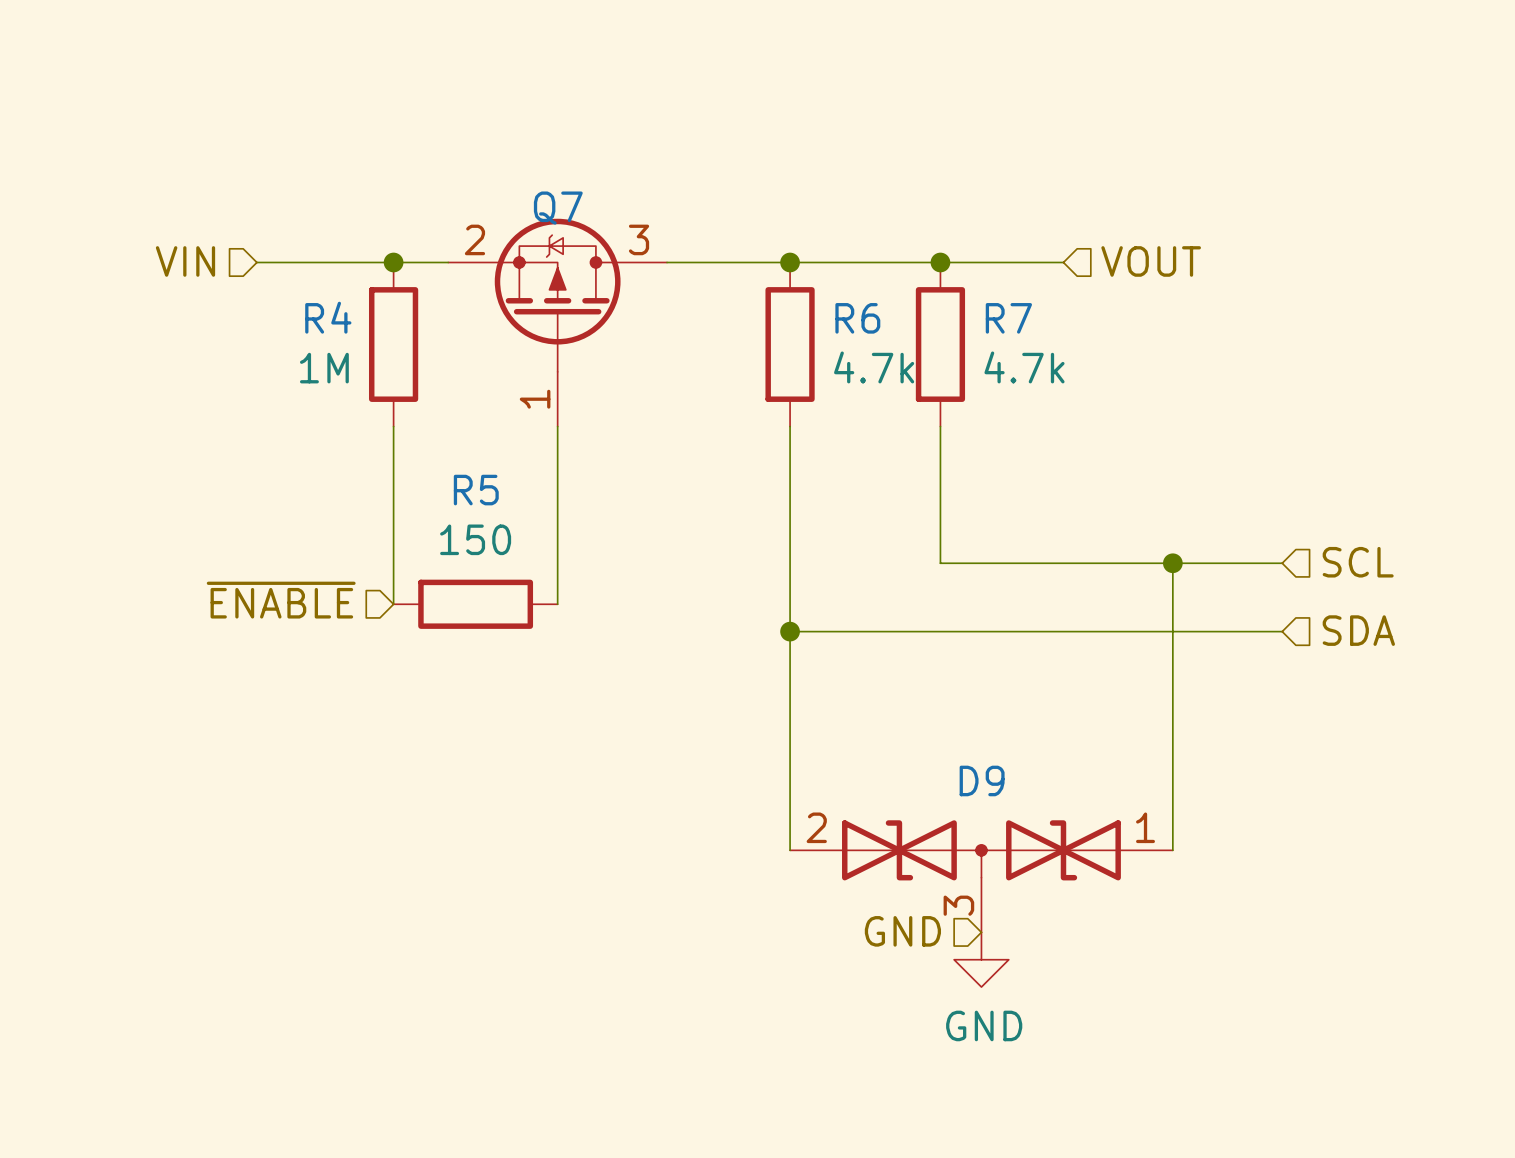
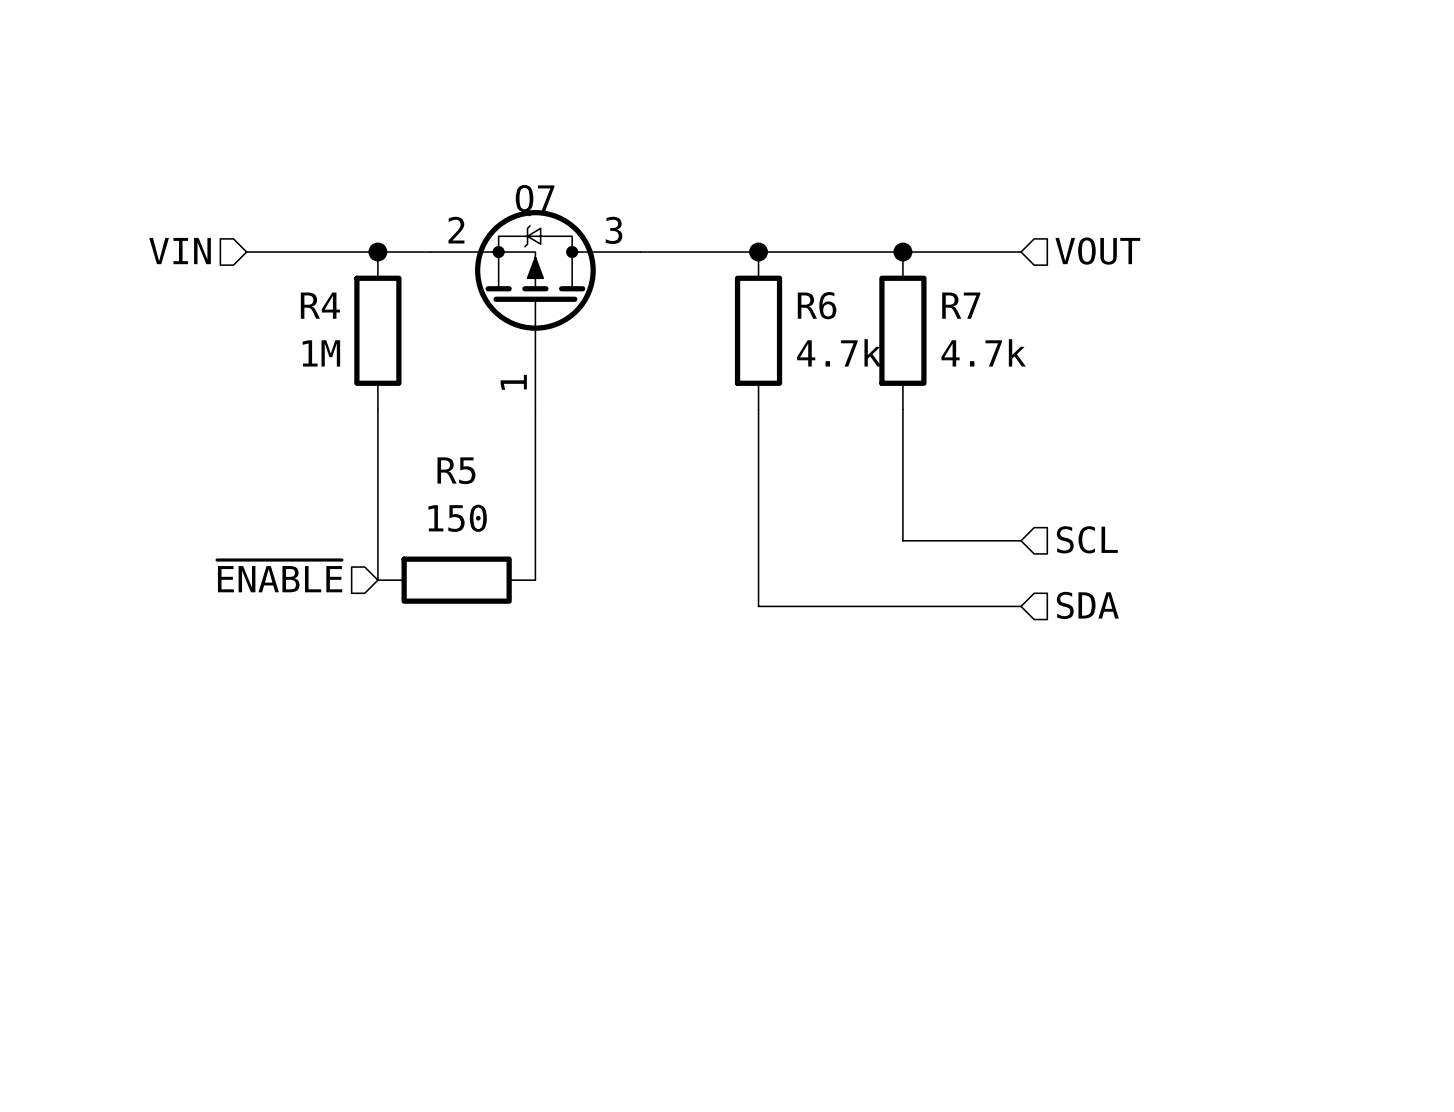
hierarchical label position: SCL (1358, 562) -> SCL (1087, 539)
wire: (1063, 563) (1282, 563) -> none
wire: (1172, 563) (1172, 850) -> none
junction: (1172, 563) -> none
hierarchical label position: SDA (1358, 630) -> SDA (1087, 605)
wire: (790, 631) (790, 850) -> none
junction: (790, 631) -> none
wire: (1063, 631) (1282, 631) -> none
D9: (981, 876) -> none
hierarchical label: GND (902, 931) -> none
power symbol: GND (981, 959) -> none

